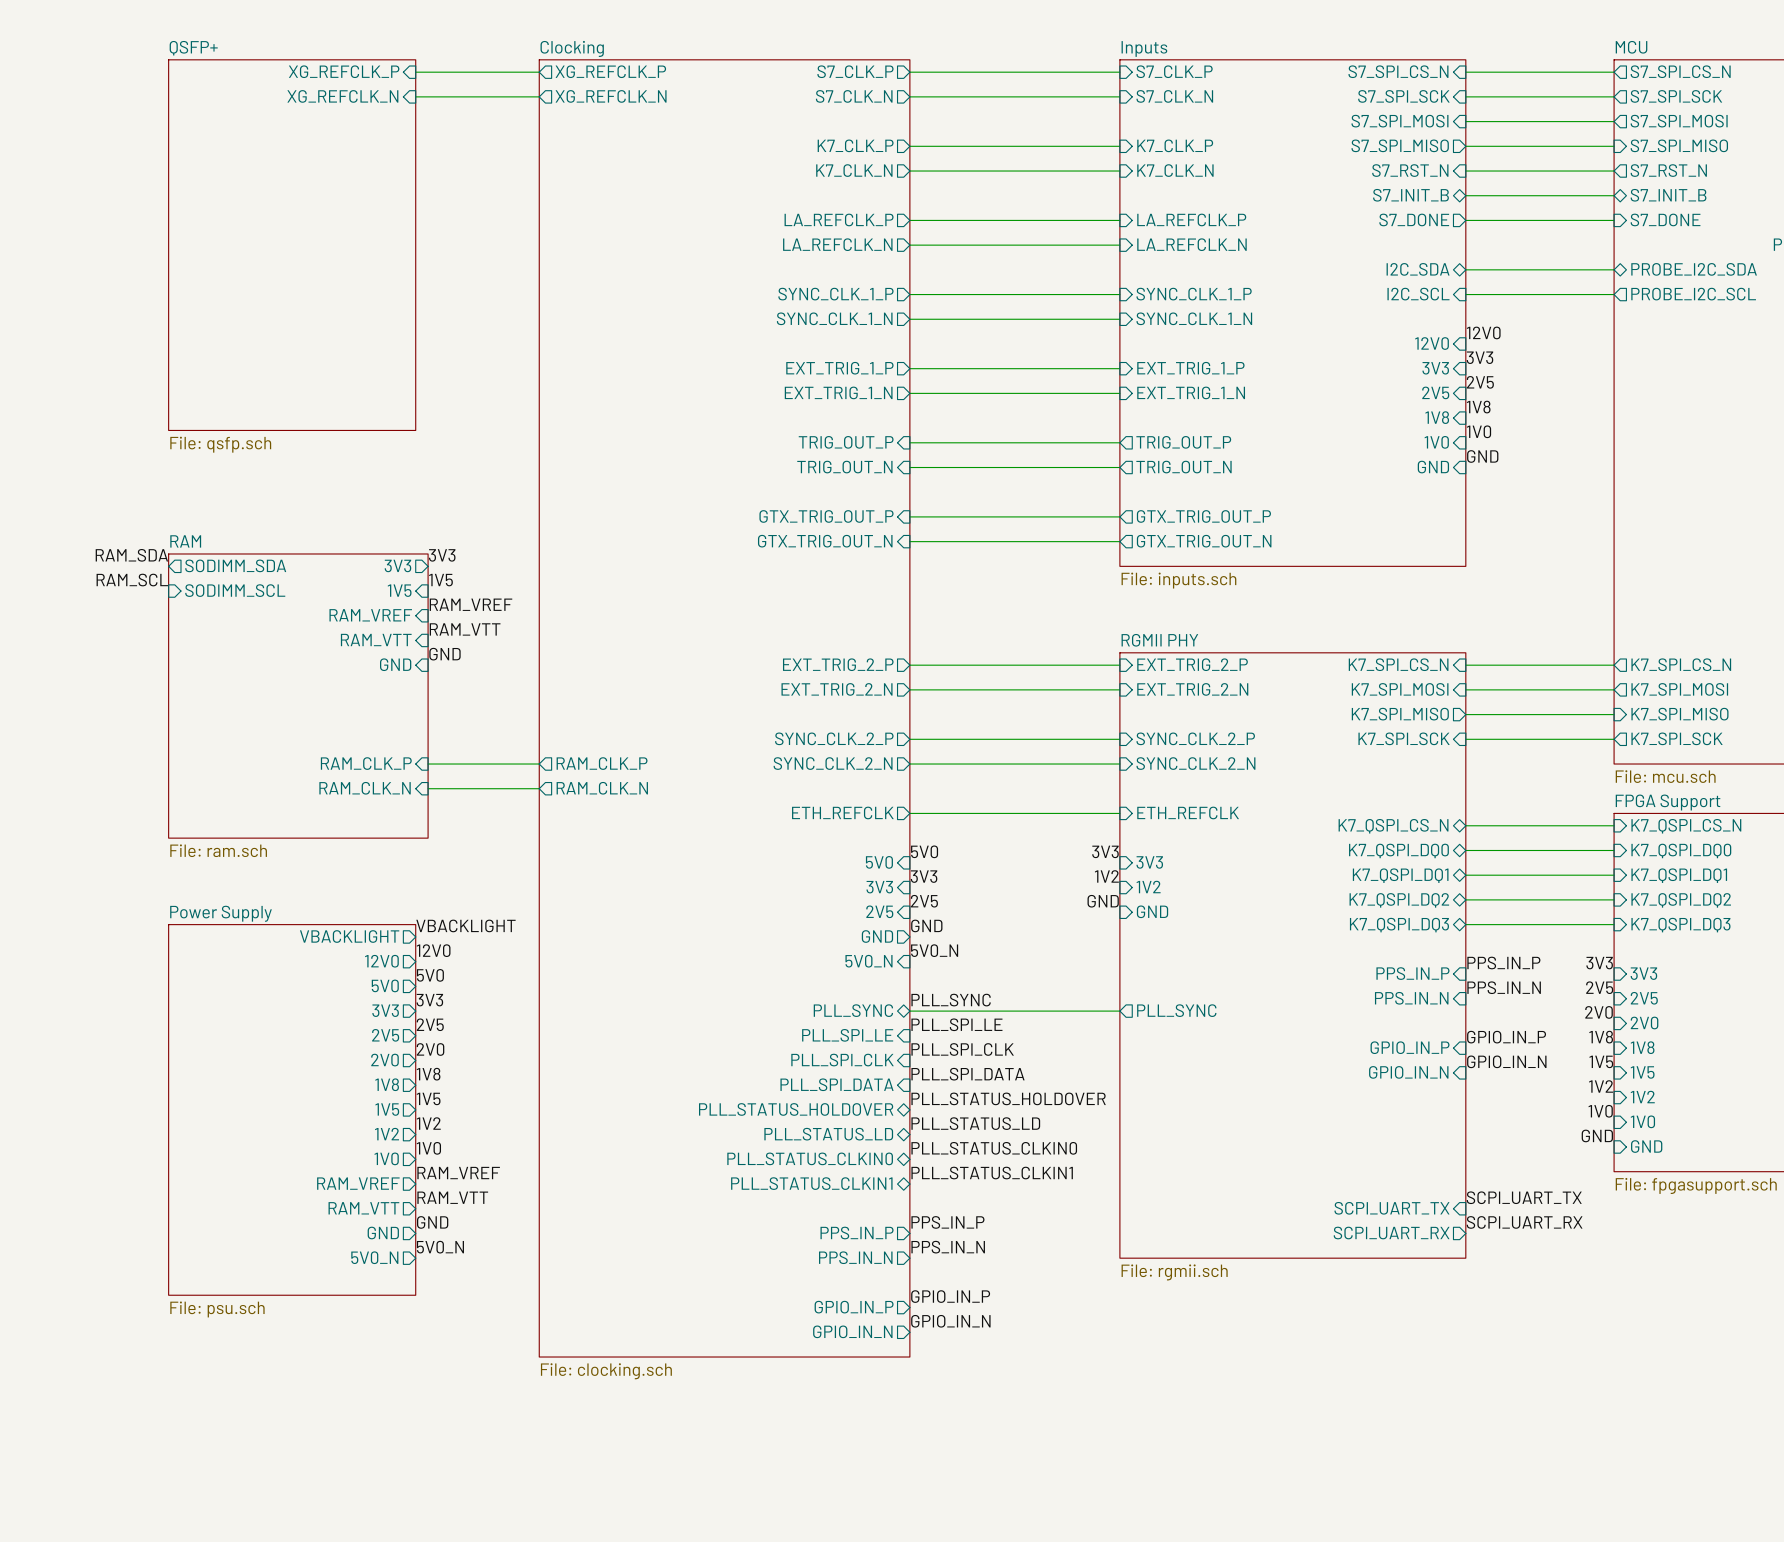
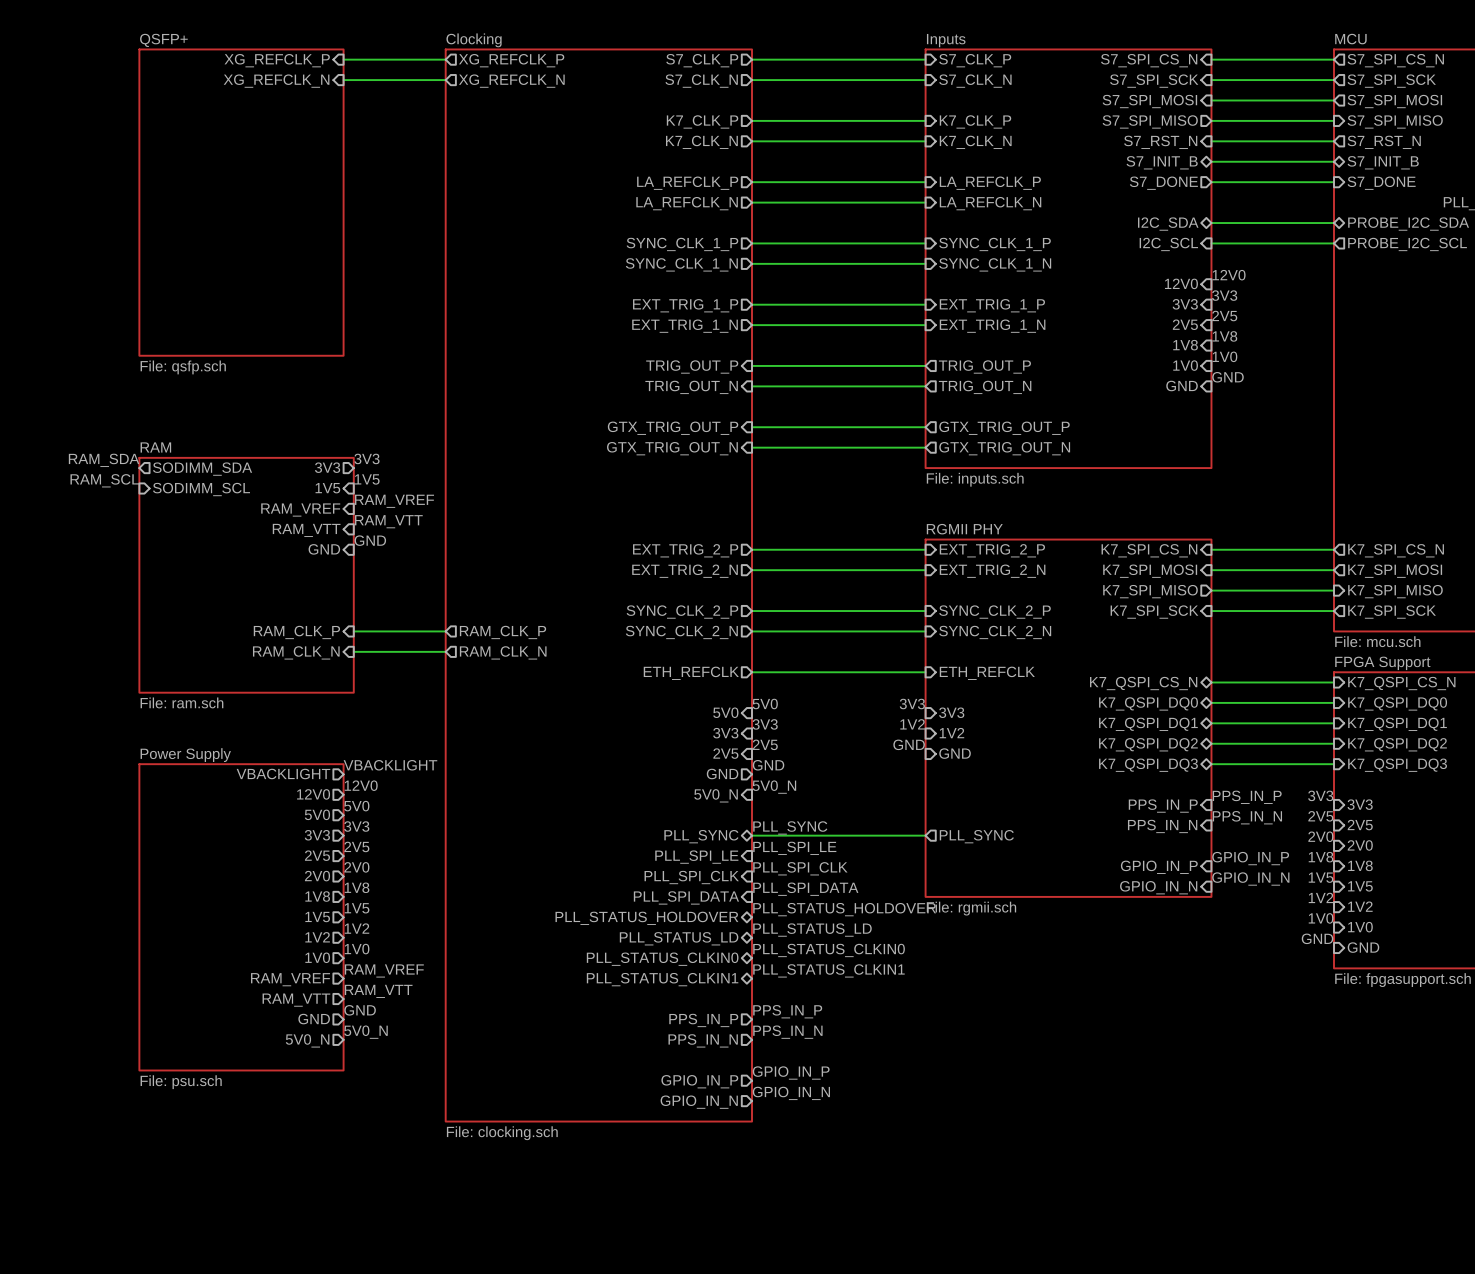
sheet RGMII PHY: none -> File: rgmii.sch (1068, 718)
sheet RGMII PHY: File: rgmii.sch (1292, 955) -> none
label: SCPI_UART_TX (1524, 1197) -> none
sheet pin: SCPI_UART_TX (1391, 1208) -> none
label: SCPI_UART_RX (1524, 1222) -> none
sheet pin: SCPI_UART_RX (1391, 1233) -> none

